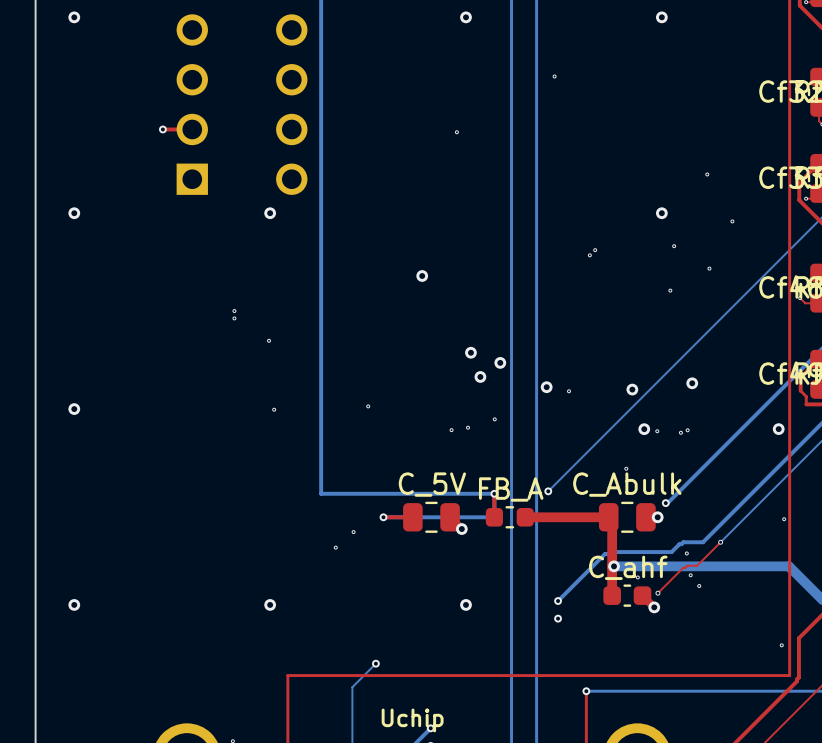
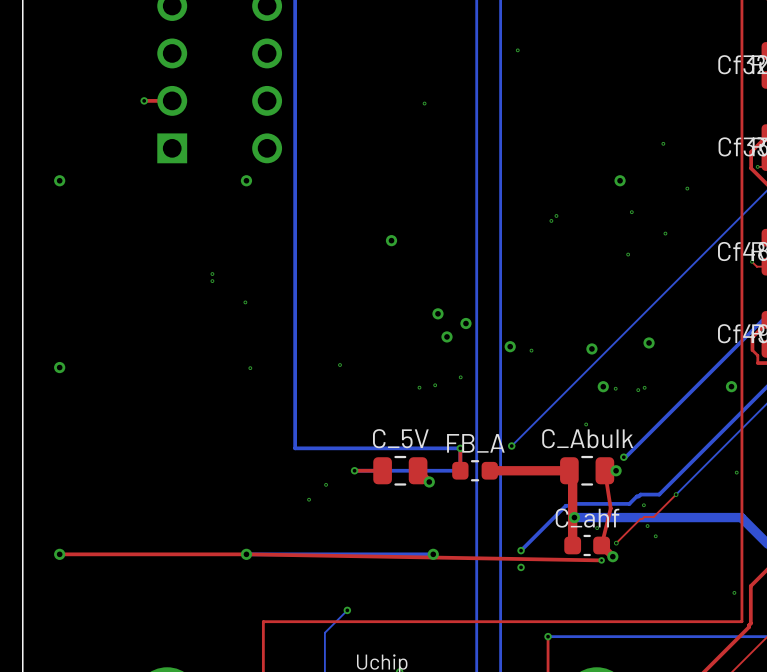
top track: none -> (604, 470) (610, 508) (601, 545)
top track: none -> (59, 554) (246, 554) (601, 560)
bottom track: none -> (246, 554) (433, 554)
via: none -> (601, 560)

